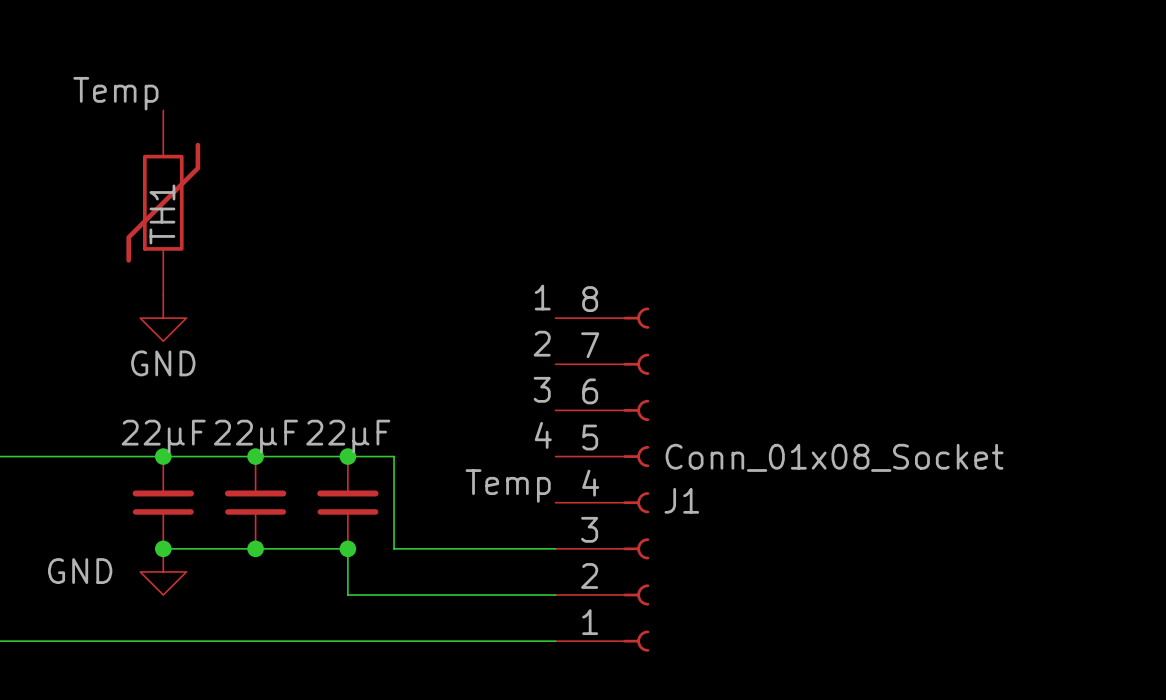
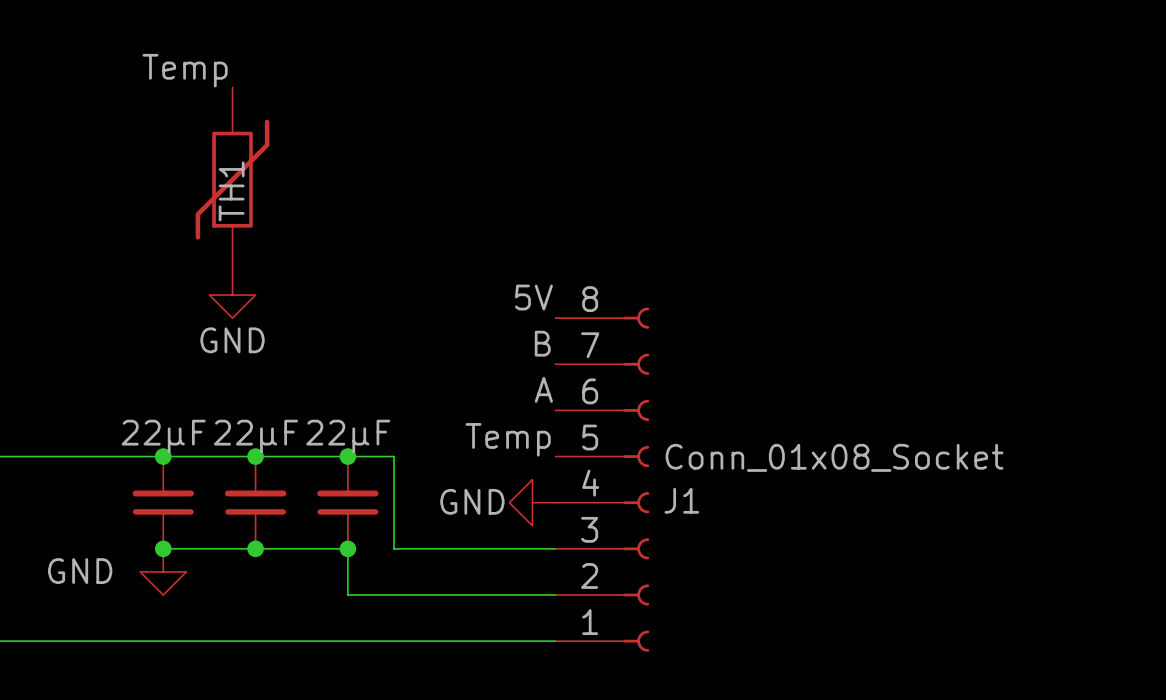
label position: Temp (115, 93) -> Temp (185, 70)
TH1 position: (163, 202) -> (232, 179)
label: 1 (542, 297) -> 5V (533, 297)
power symbol position: GND (163, 318) -> GND (232, 295)
label: 2 (542, 343) -> B (542, 343)
label: 3 (542, 389) -> A (543, 389)
label: 4 (543, 435) -> Temp (508, 439)
label: Temp (508, 485) -> none
power symbol: none -> GND (532, 502)

